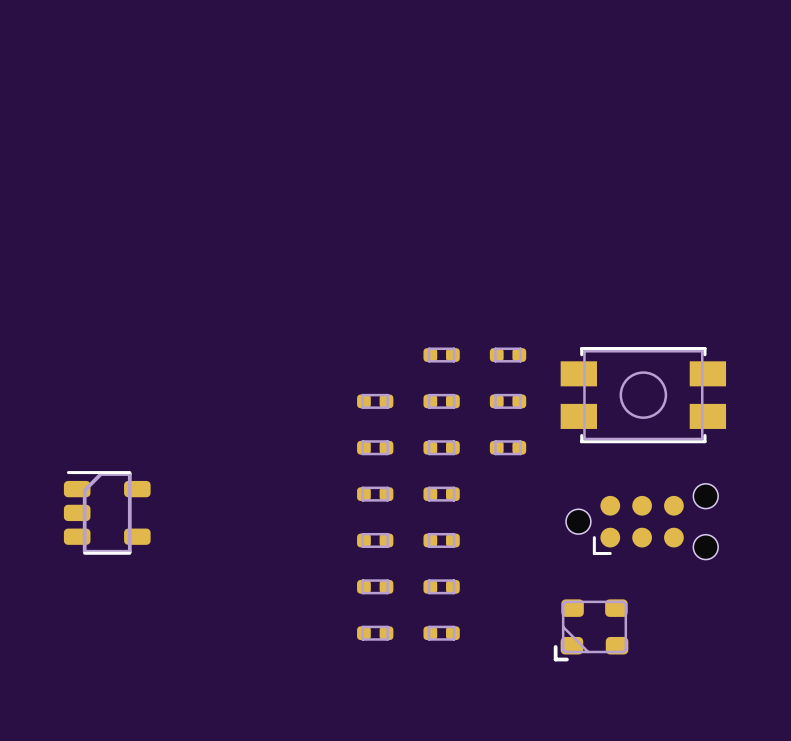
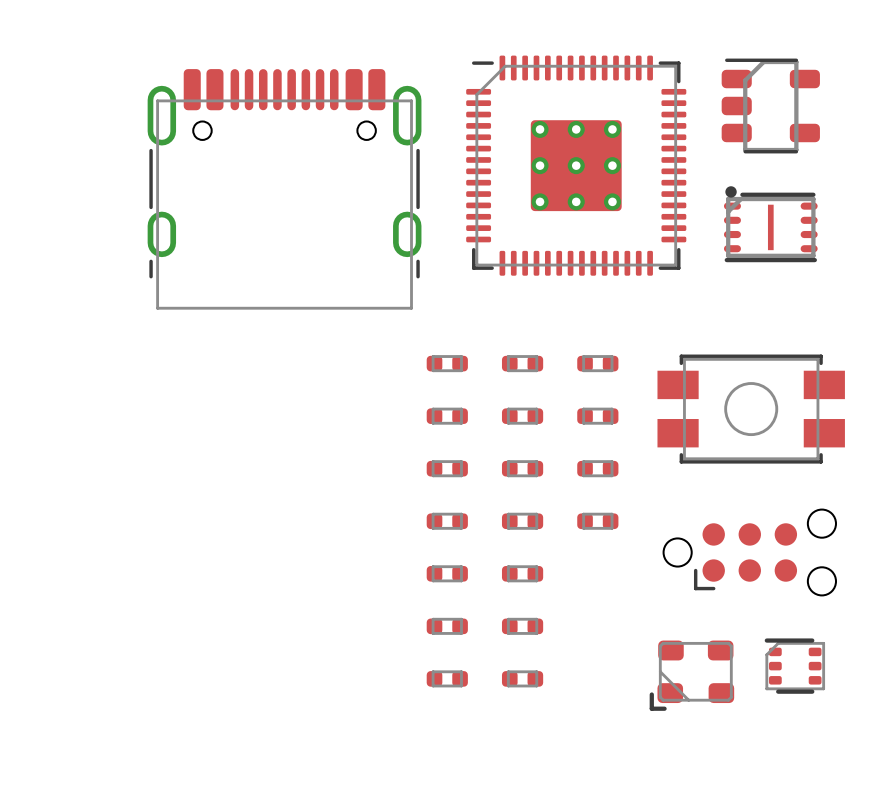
part: none -> (770, 106)
part: none -> (576, 165)
part: none -> (284, 189)
part: none -> (770, 224)
part: none -> (447, 363)
part: none -> (597, 521)
part: (107, 512) -> none
part: none -> (794, 666)

